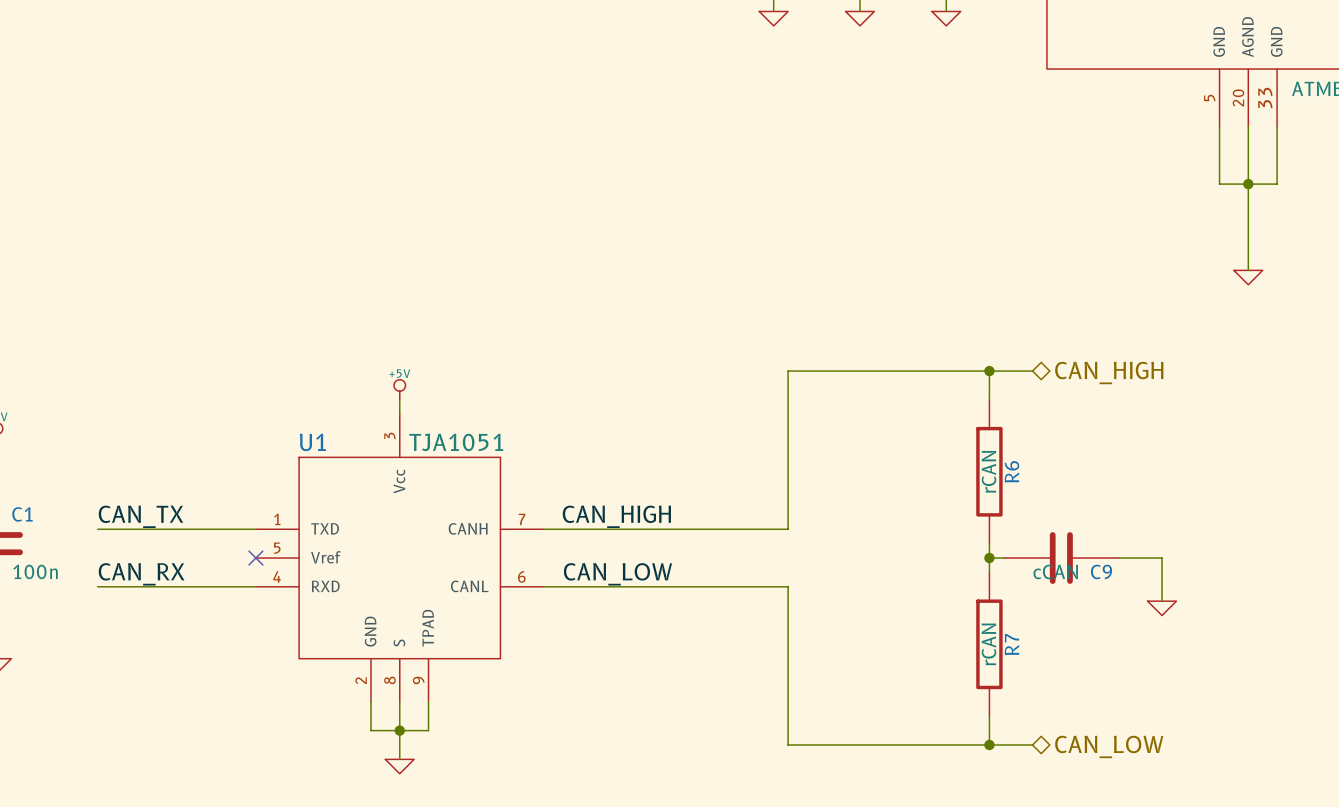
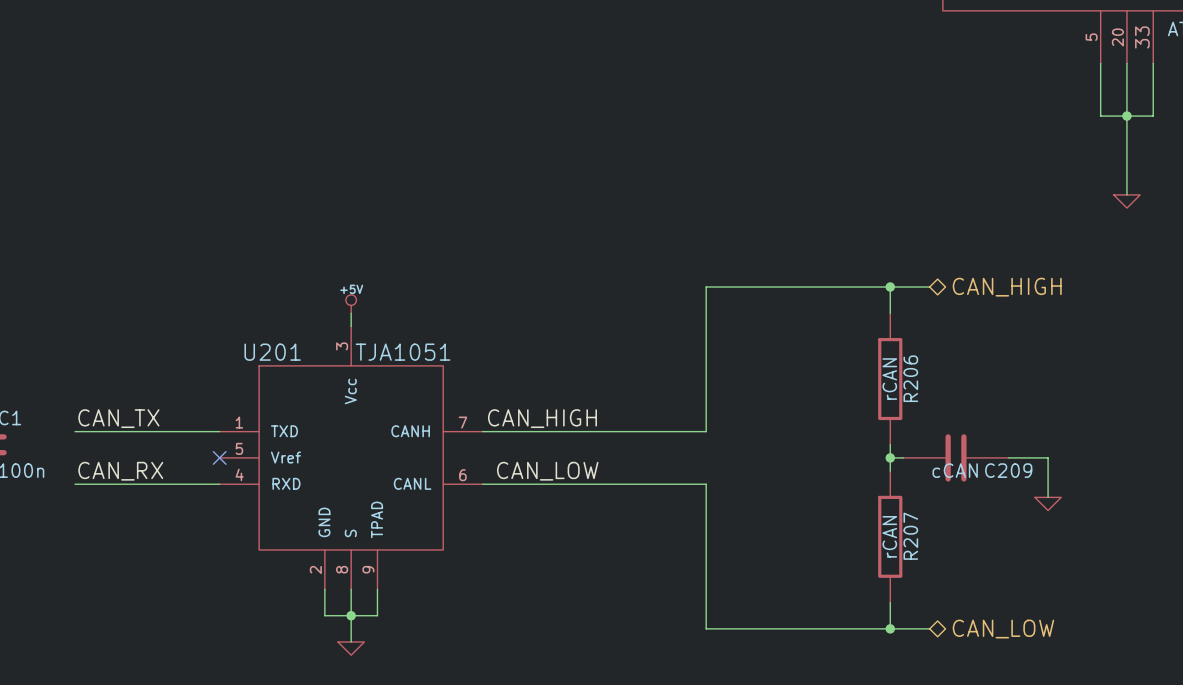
U1 name: U1 (312, 442) -> U201 (272, 352)
R6 name: R6 (1012, 471) -> R206 (910, 378)
C9 name: C9 (1101, 571) -> C209 (1008, 470)
R7 name: R7 (1011, 644) -> R207 (910, 536)

